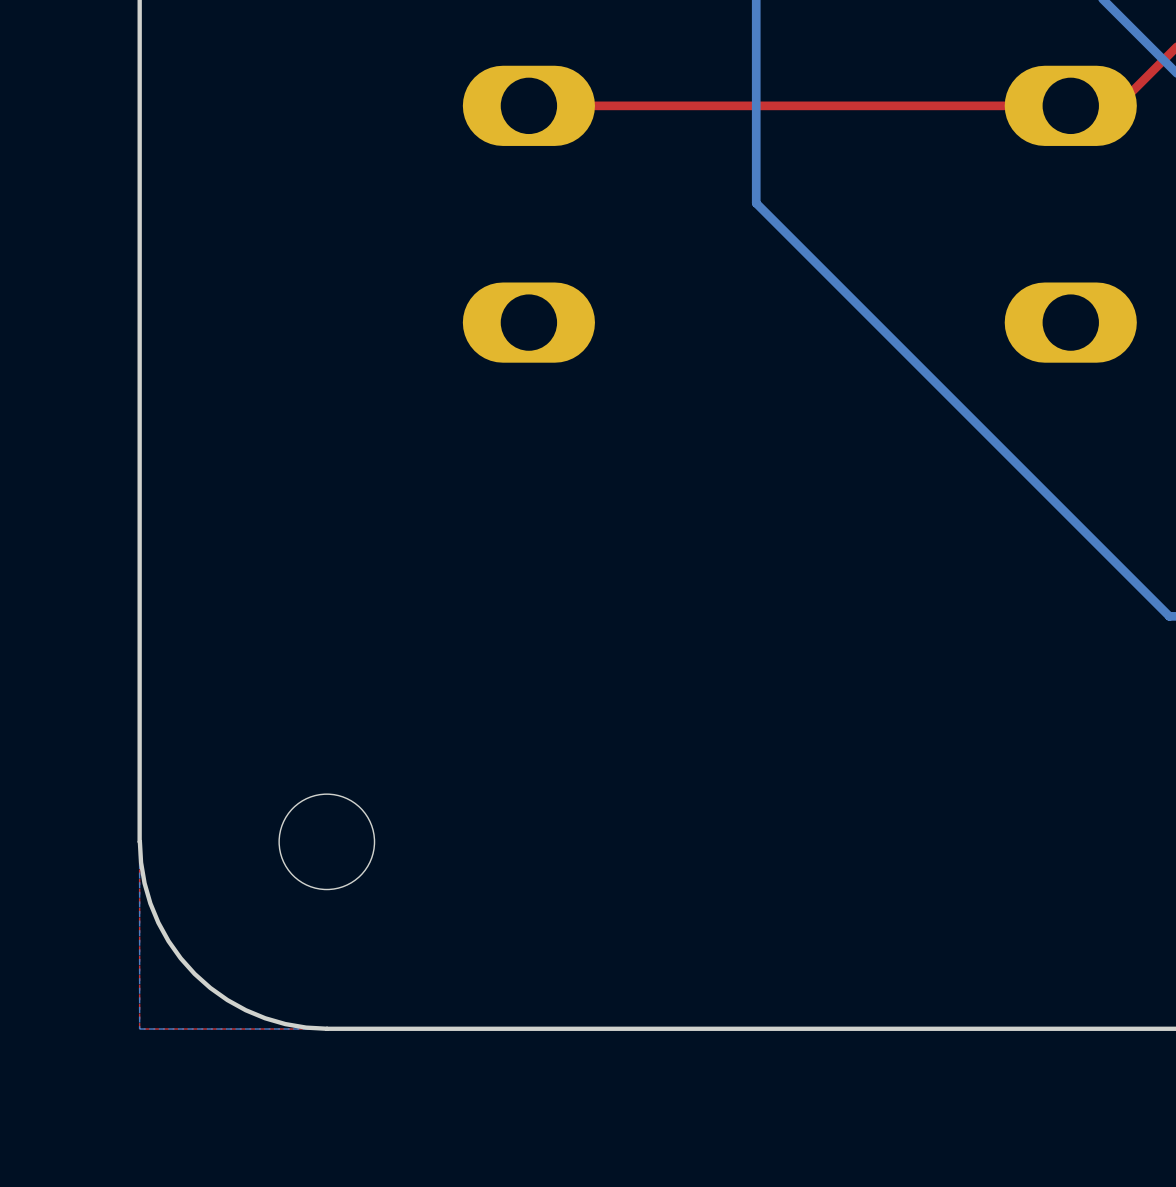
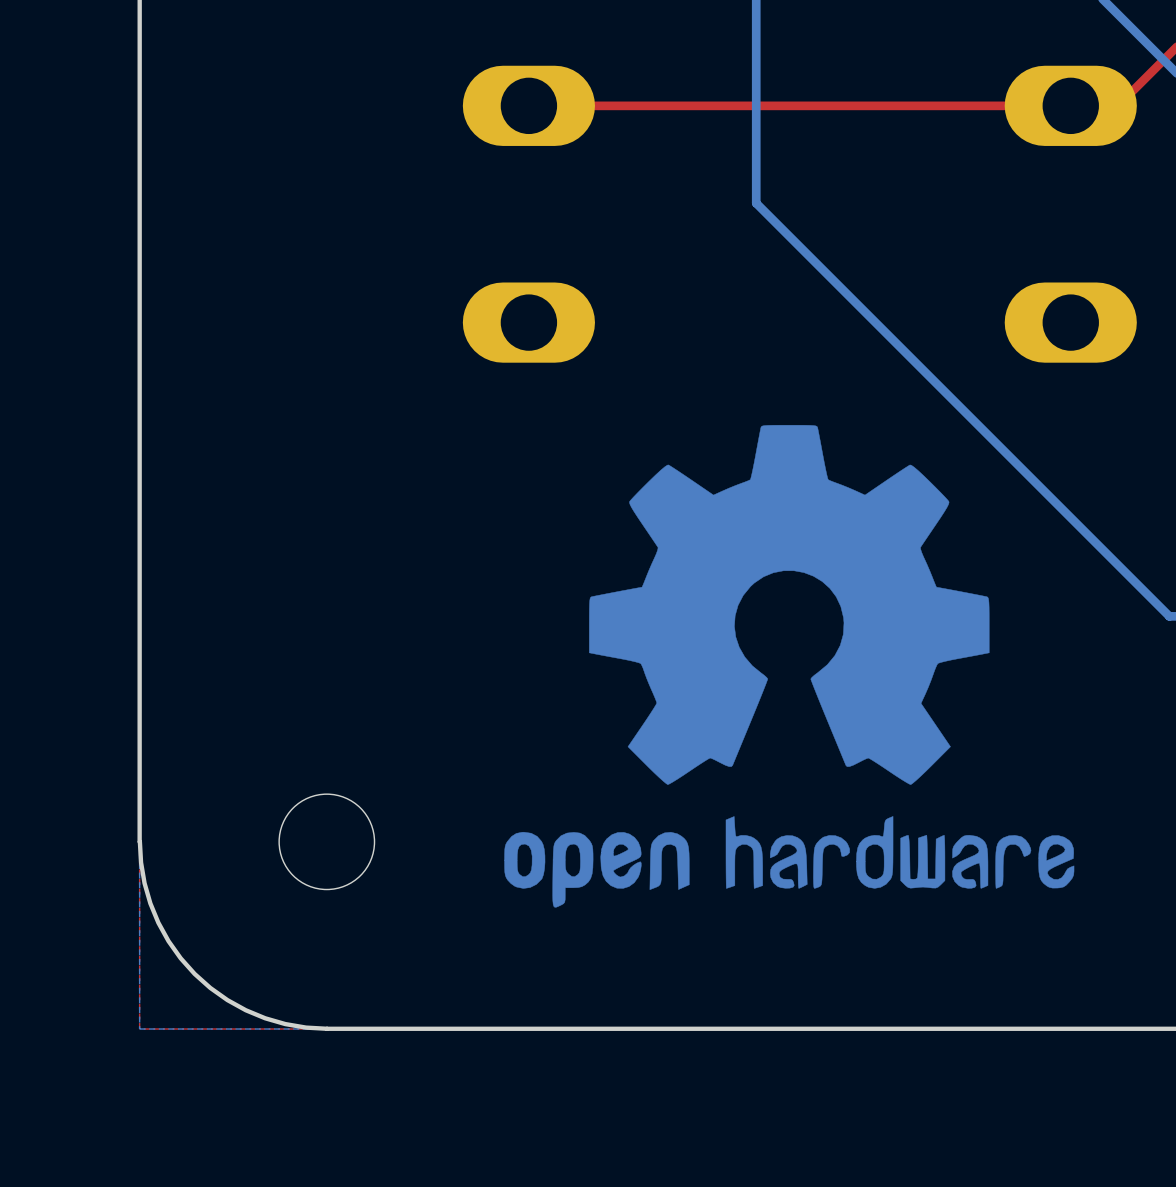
drawing: none -> [504, 424, 1075, 908]

